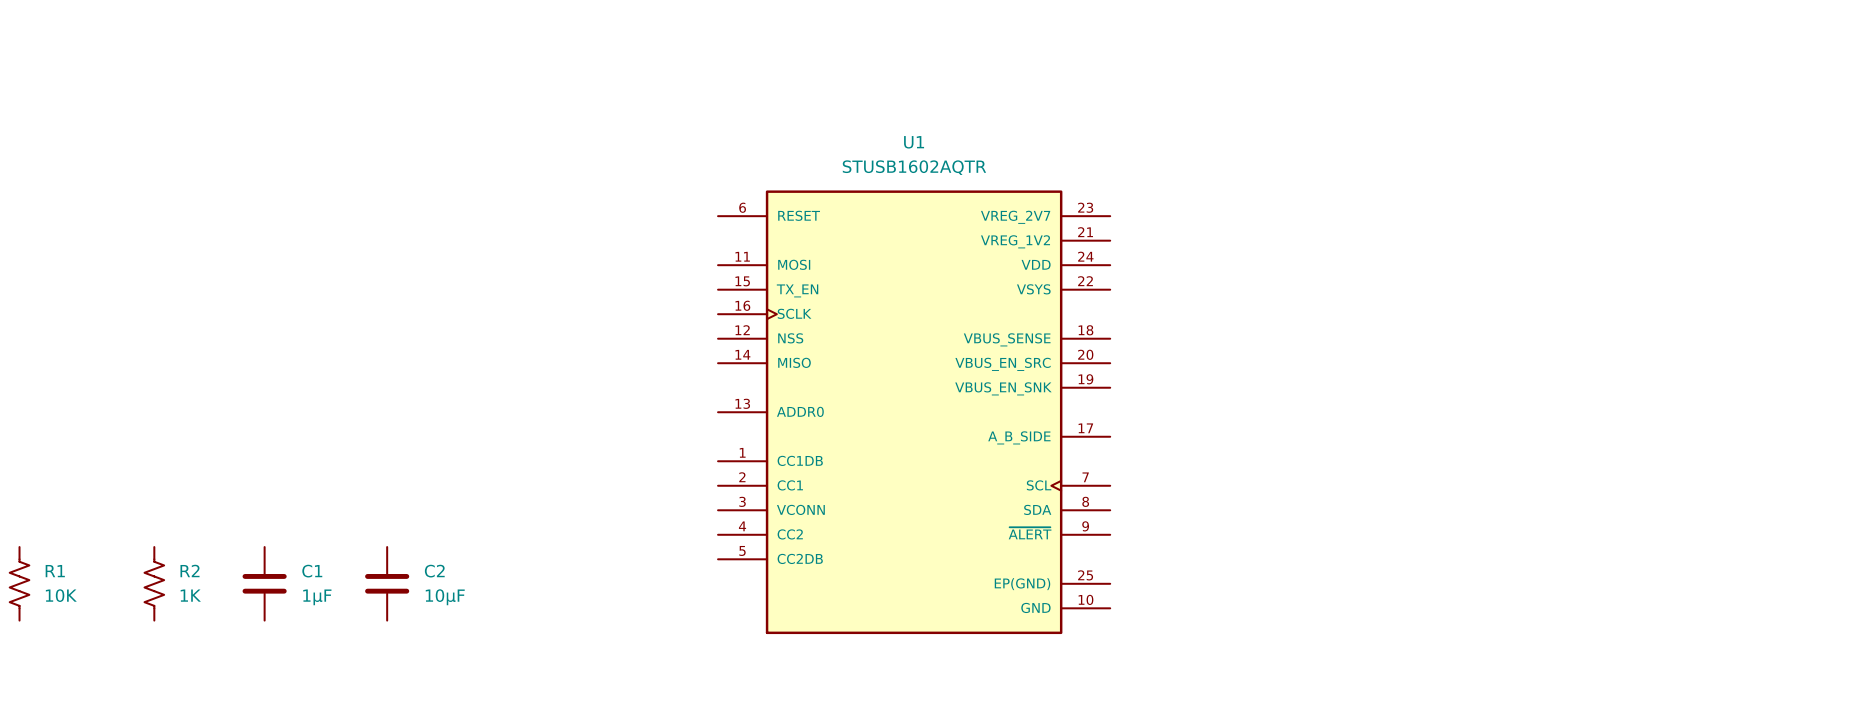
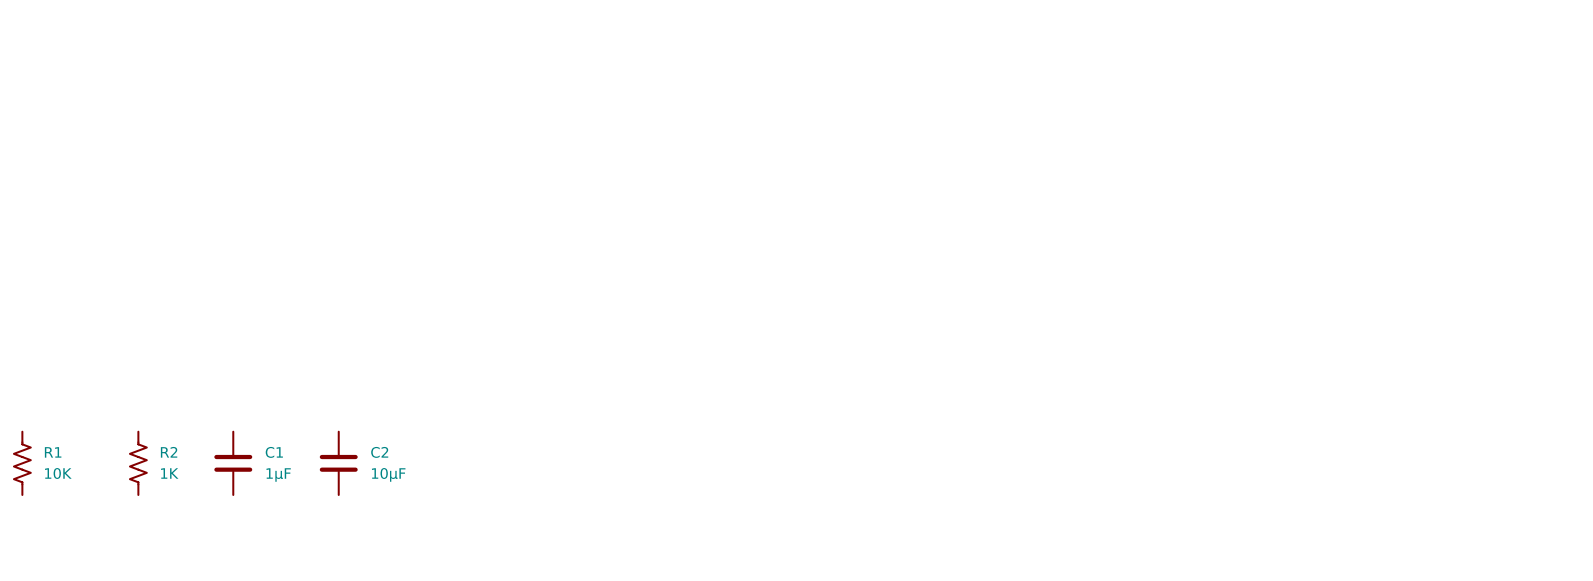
U1: STUSB1602AQTR (914, 412) -> none

